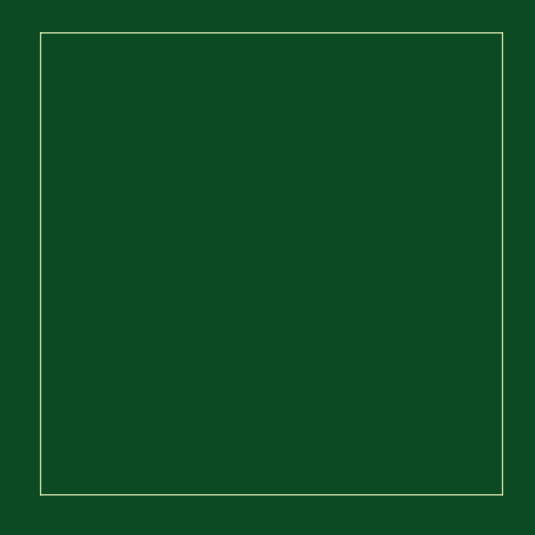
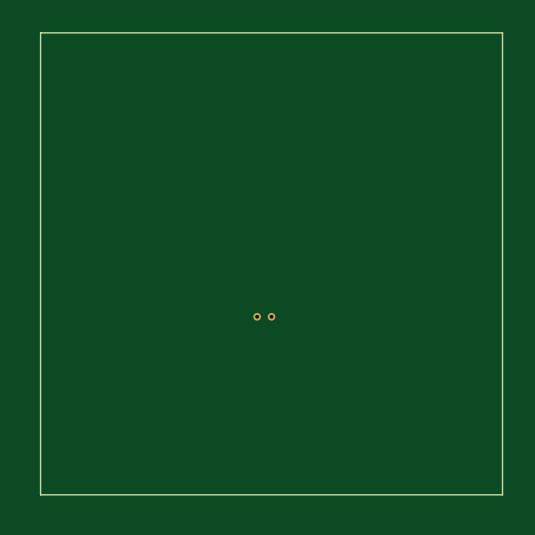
via: none -> (257, 316)
via: none -> (271, 316)

